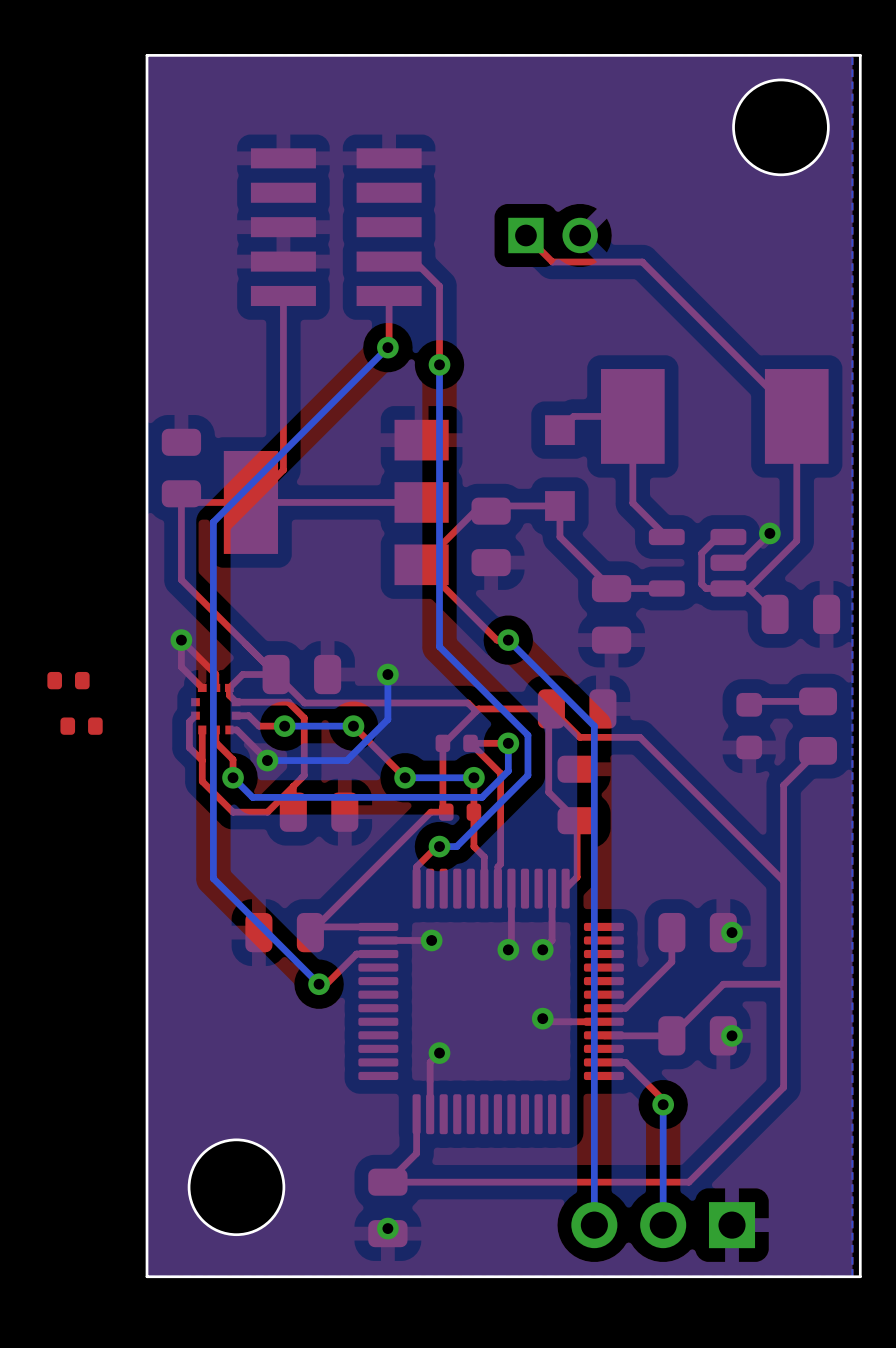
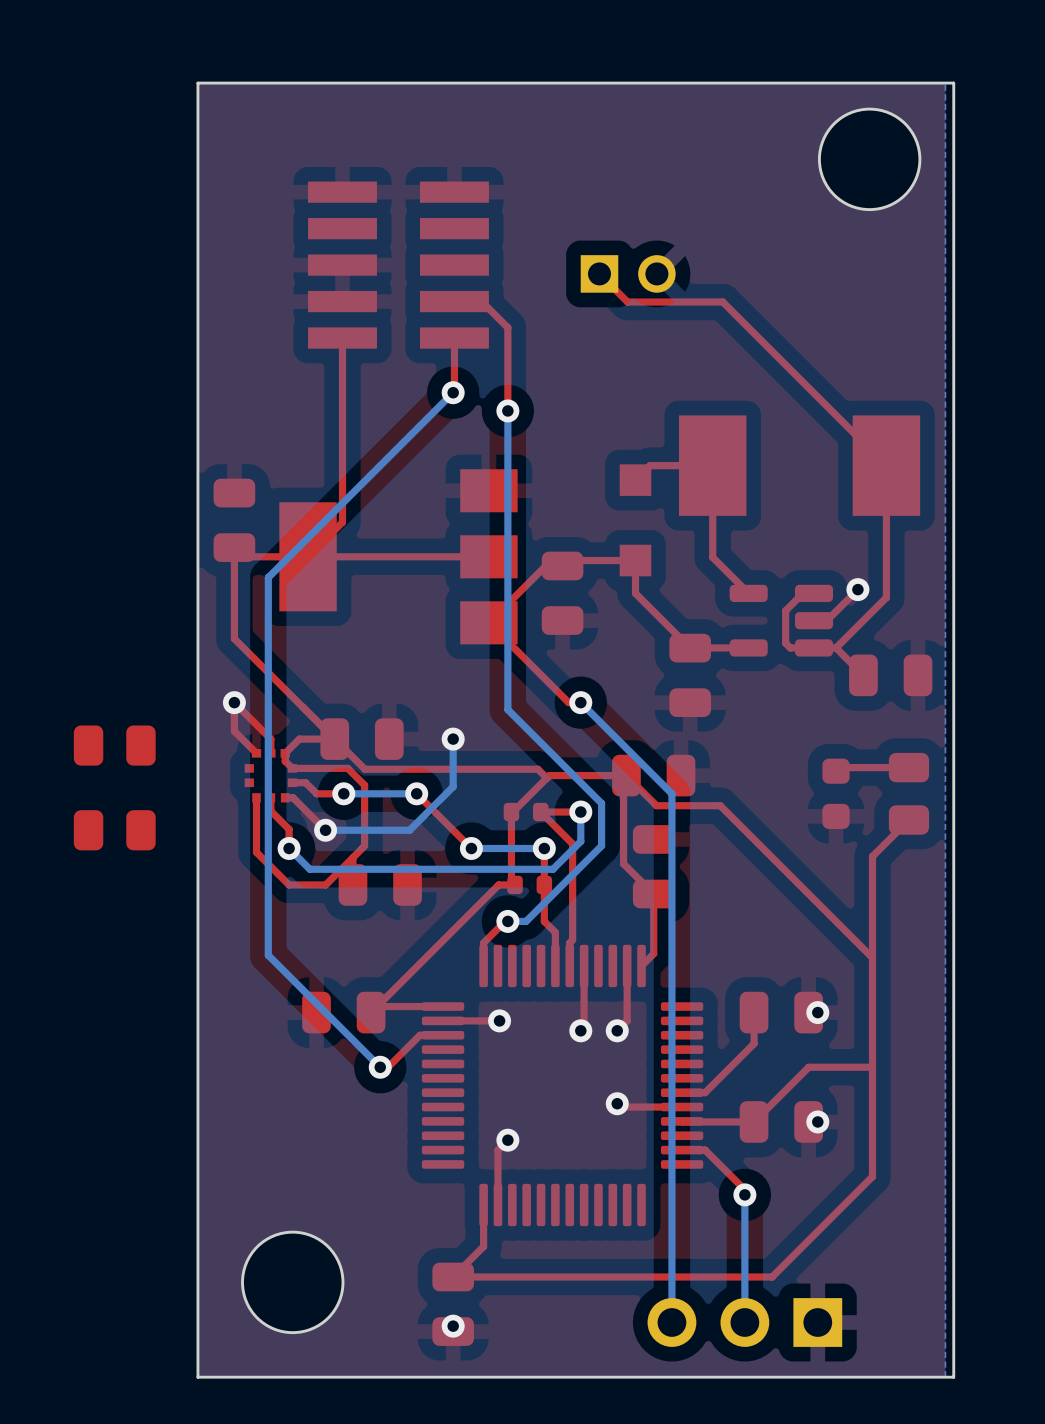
part footprint: [47, 671, 90, 690] -> [73, 725, 156, 766]
top track: (195, 715) (189, 721) (189, 747) (202, 760) -> none
part: (81, 726) -> none
part: none -> (114, 830)

